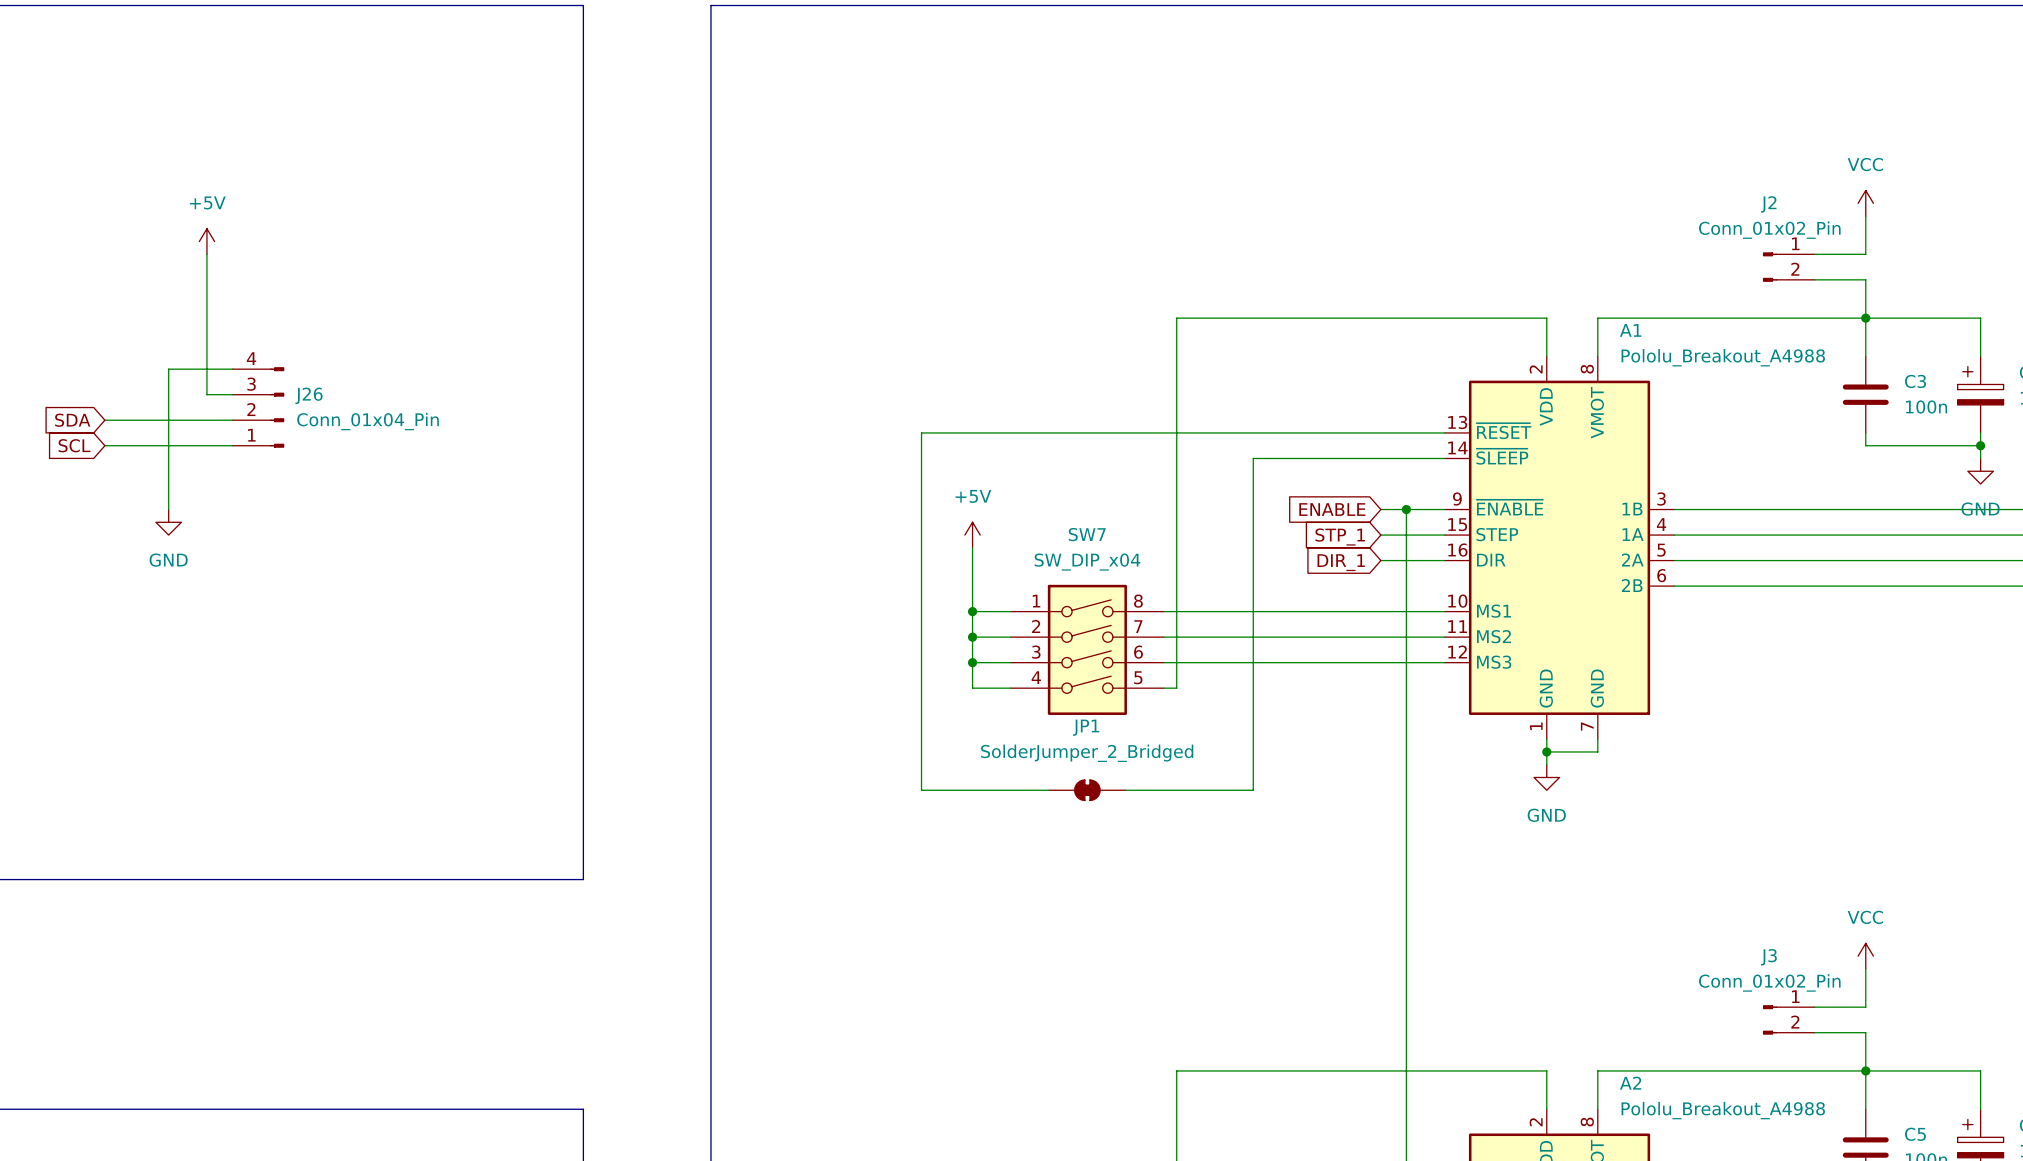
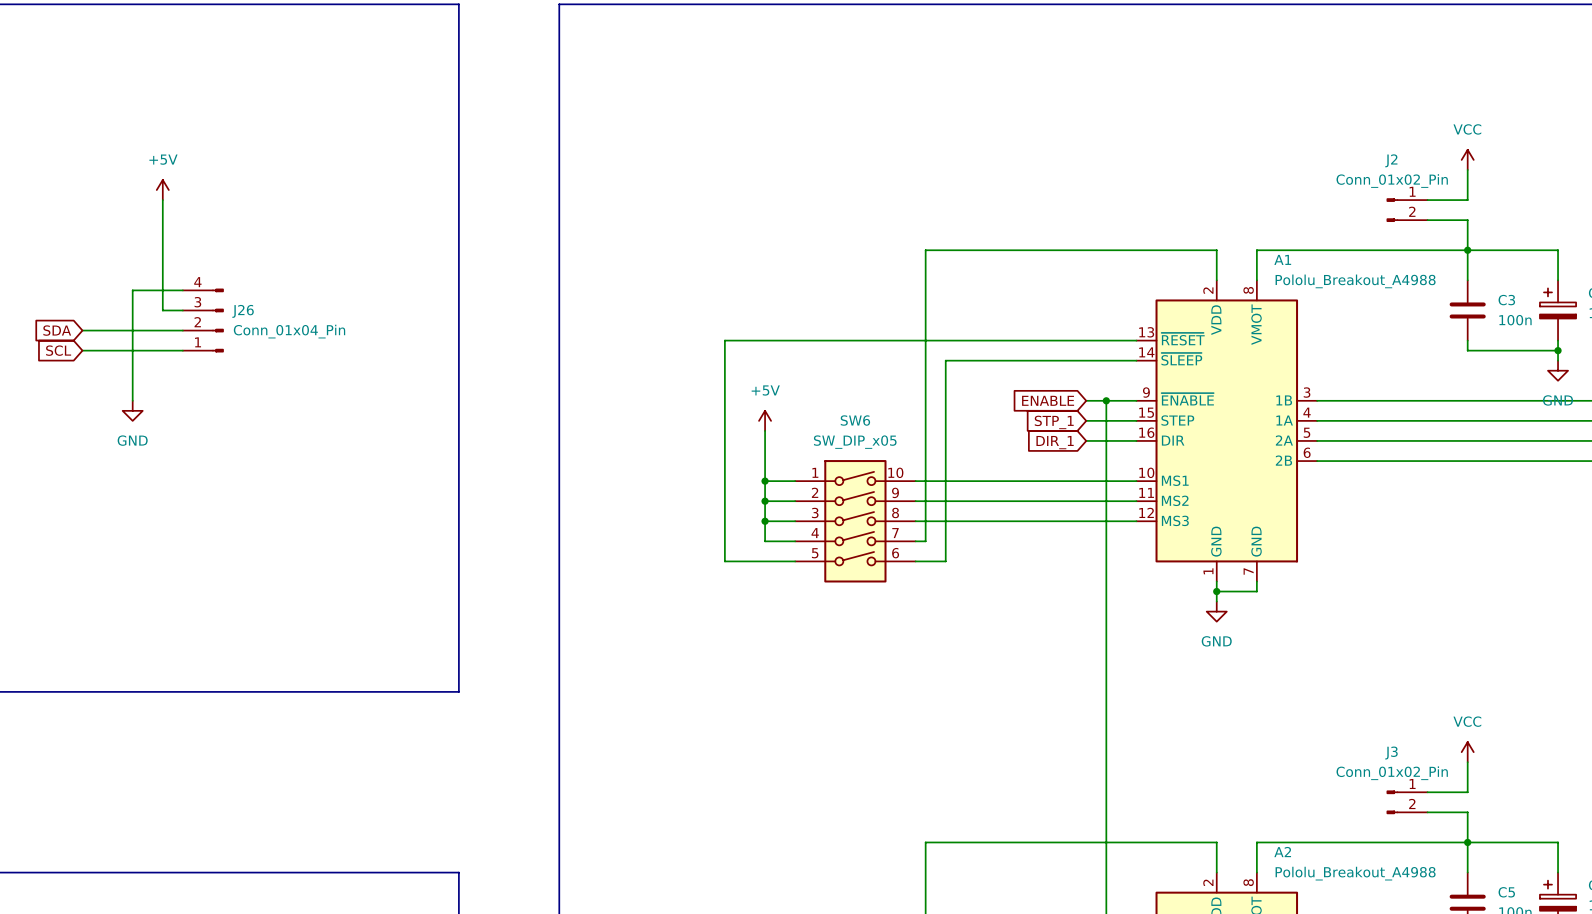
wire: (1253, 458) (1253, 790) (1125, 790) -> (985, 360) (945, 360) (945, 561) (915, 561)
SW7: SW_DIP_x04 (1087, 649) -> none
SW6: none -> SW_DIP_x05 (855, 521)
wire: (921, 713) (921, 790) (1049, 790) -> (724, 561) (795, 561)
JP1: SolderJumper_2_Bridged (1087, 790) -> none

